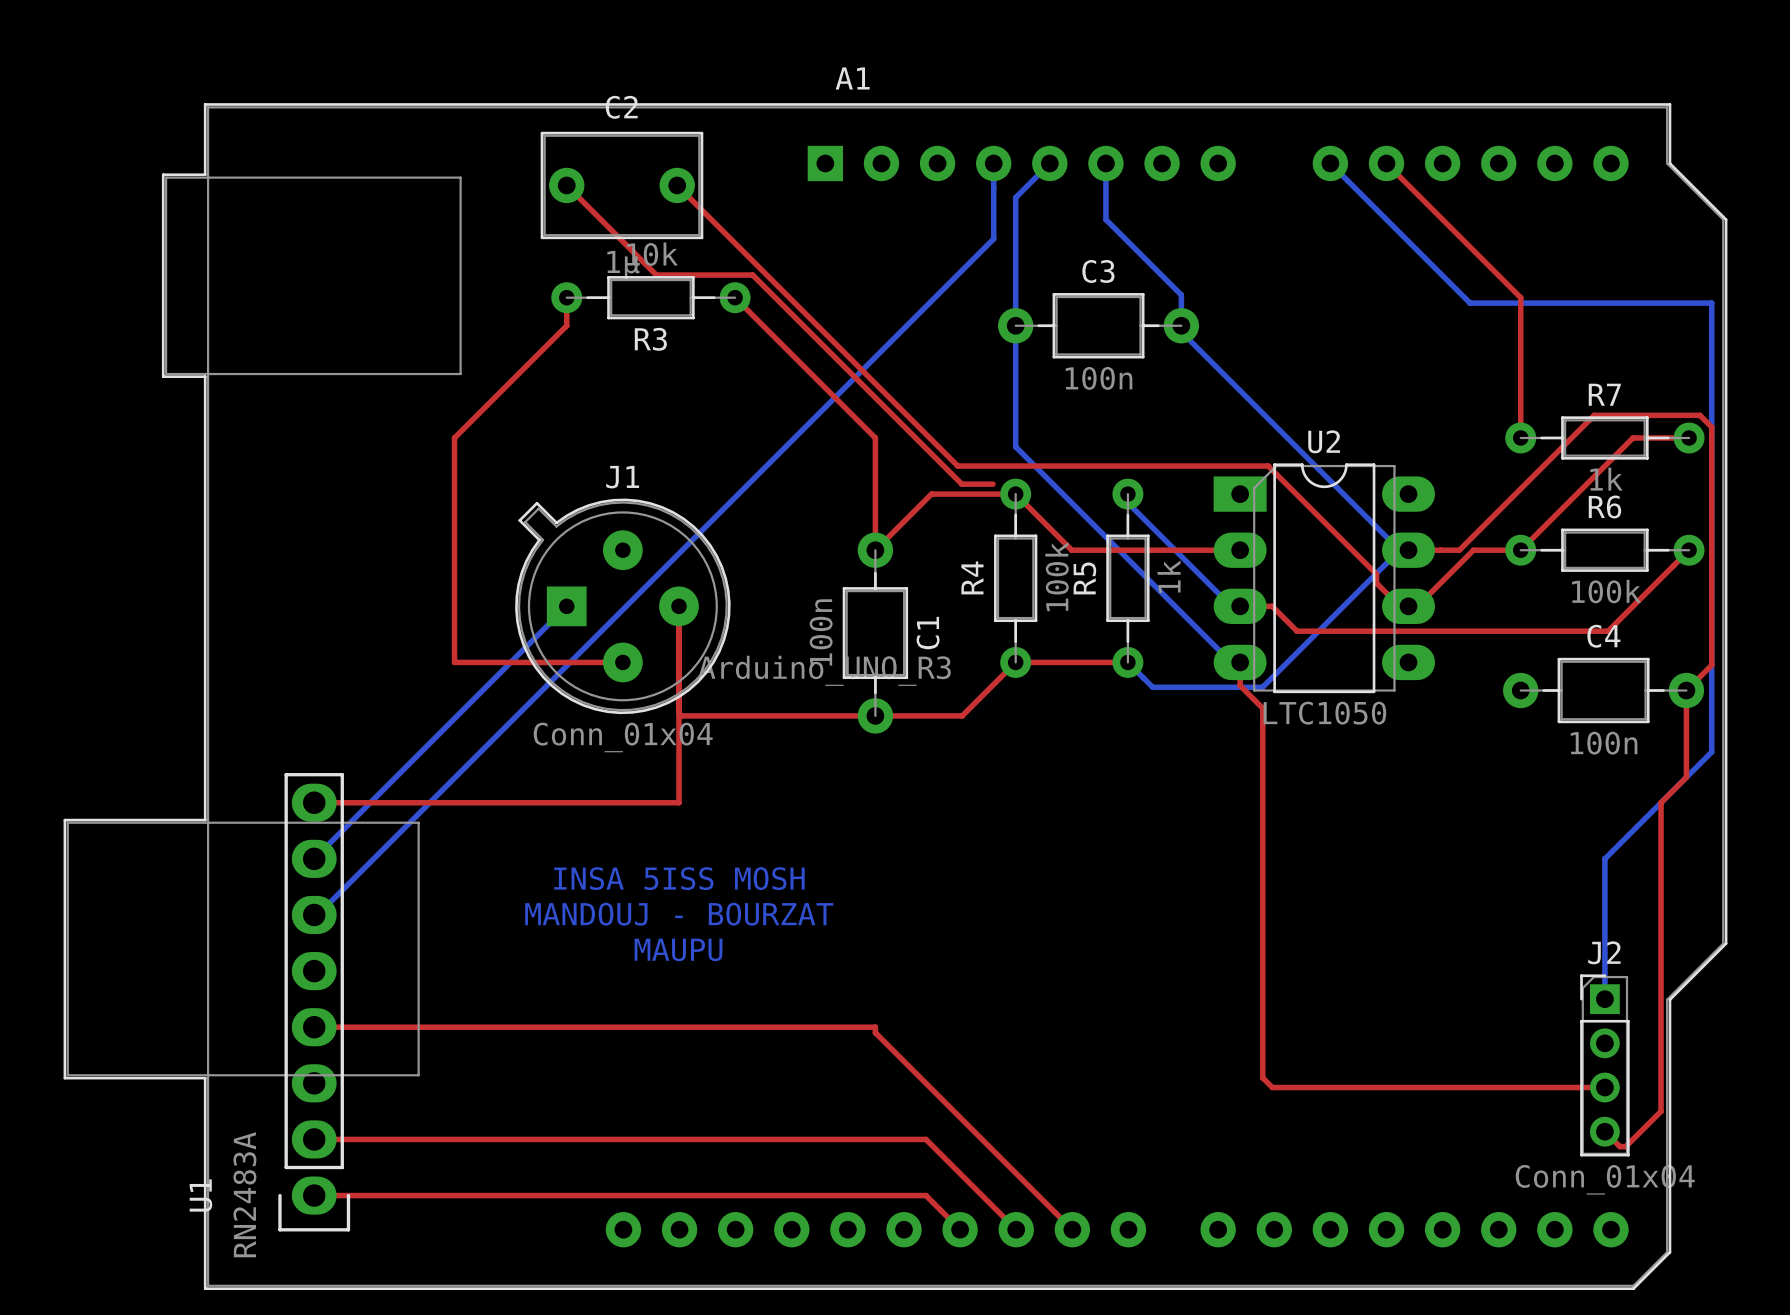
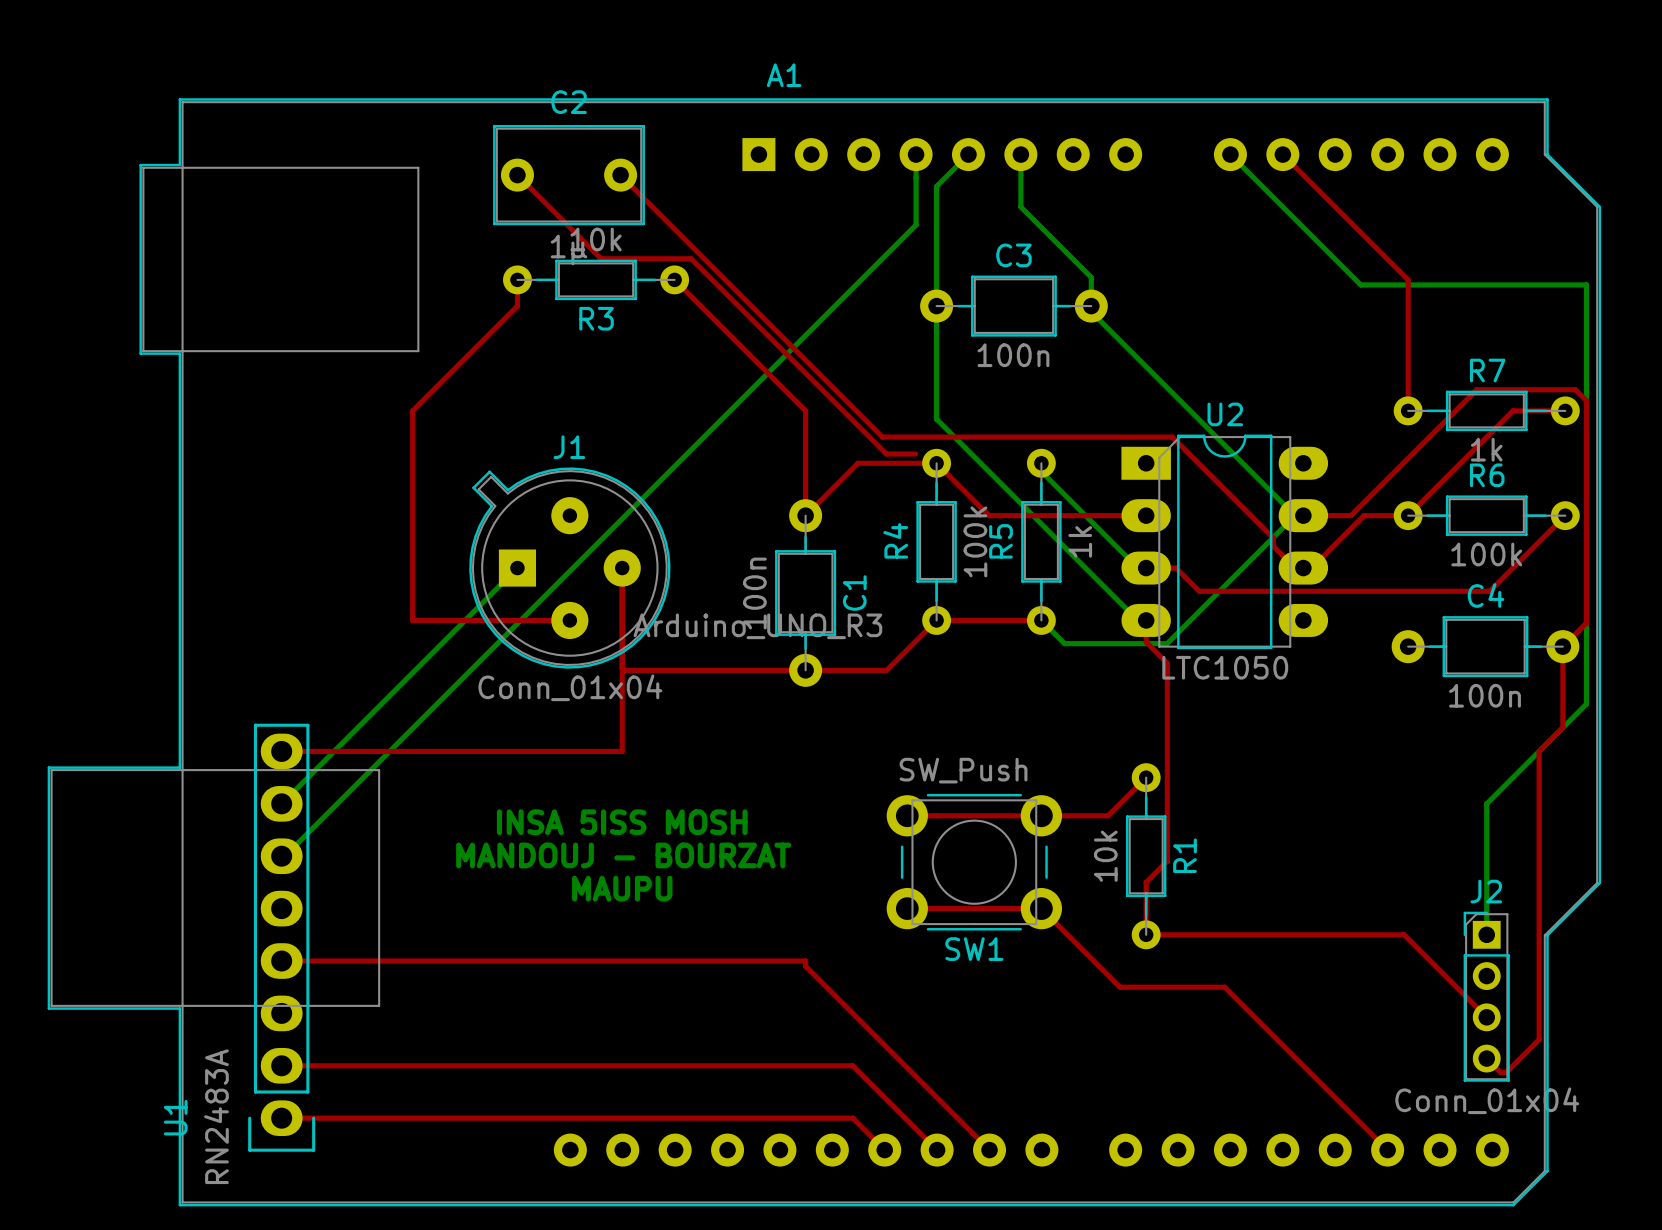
top track: none -> (1146, 777) (1108, 815) (907, 815)
R1: none -> 10k (1146, 856)
top track: (1262, 920) (1262, 1077) (1272, 1087) (1604, 1087) -> (1167, 861) (1146, 882) (1146, 934) (1404, 934) (1486, 1017)
SW1: none -> SW_Push (974, 862)
top track: none -> (907, 908) (1041, 908) (1119, 987) (1224, 987) (1387, 1150)

